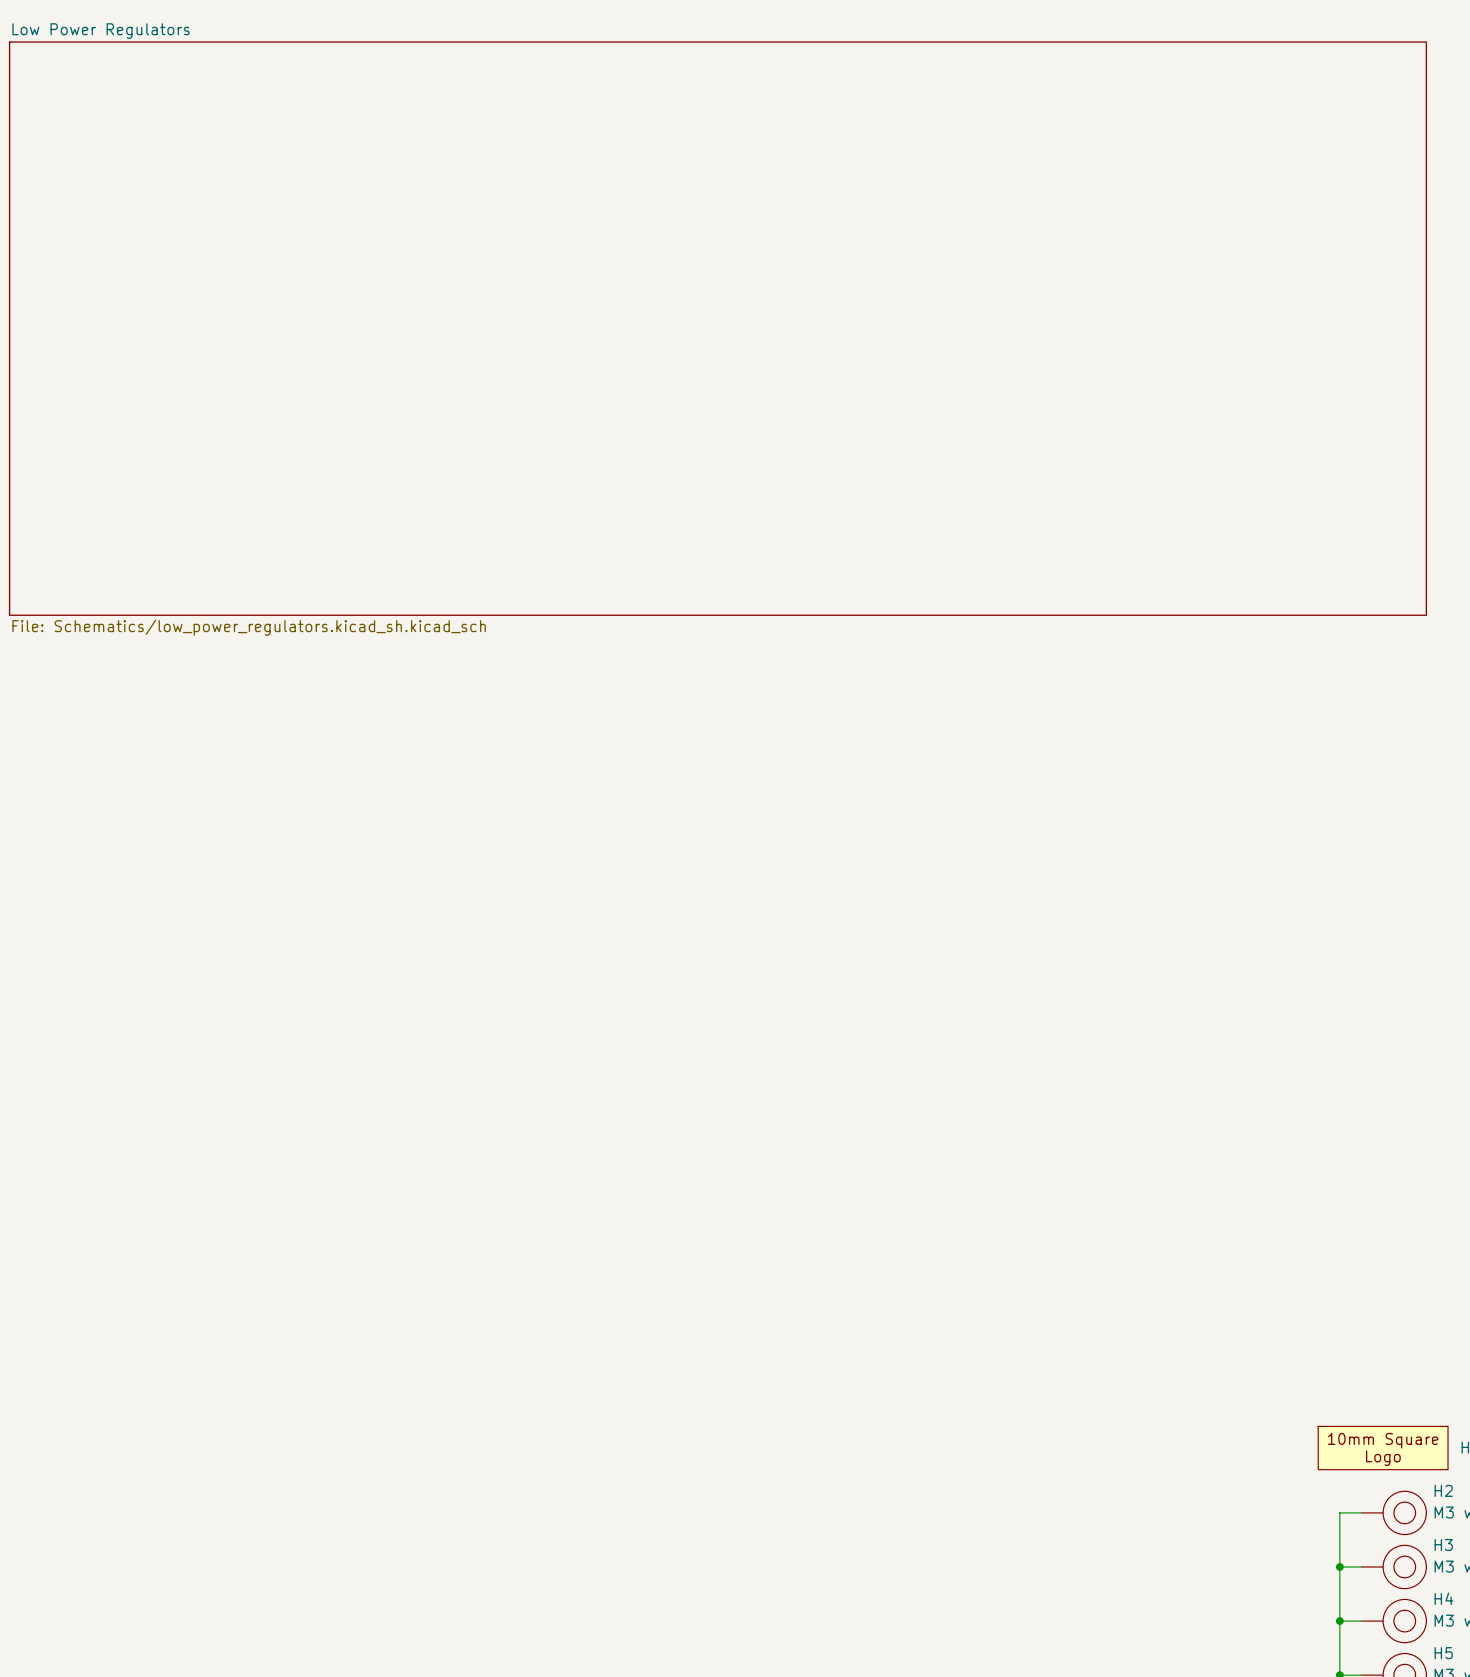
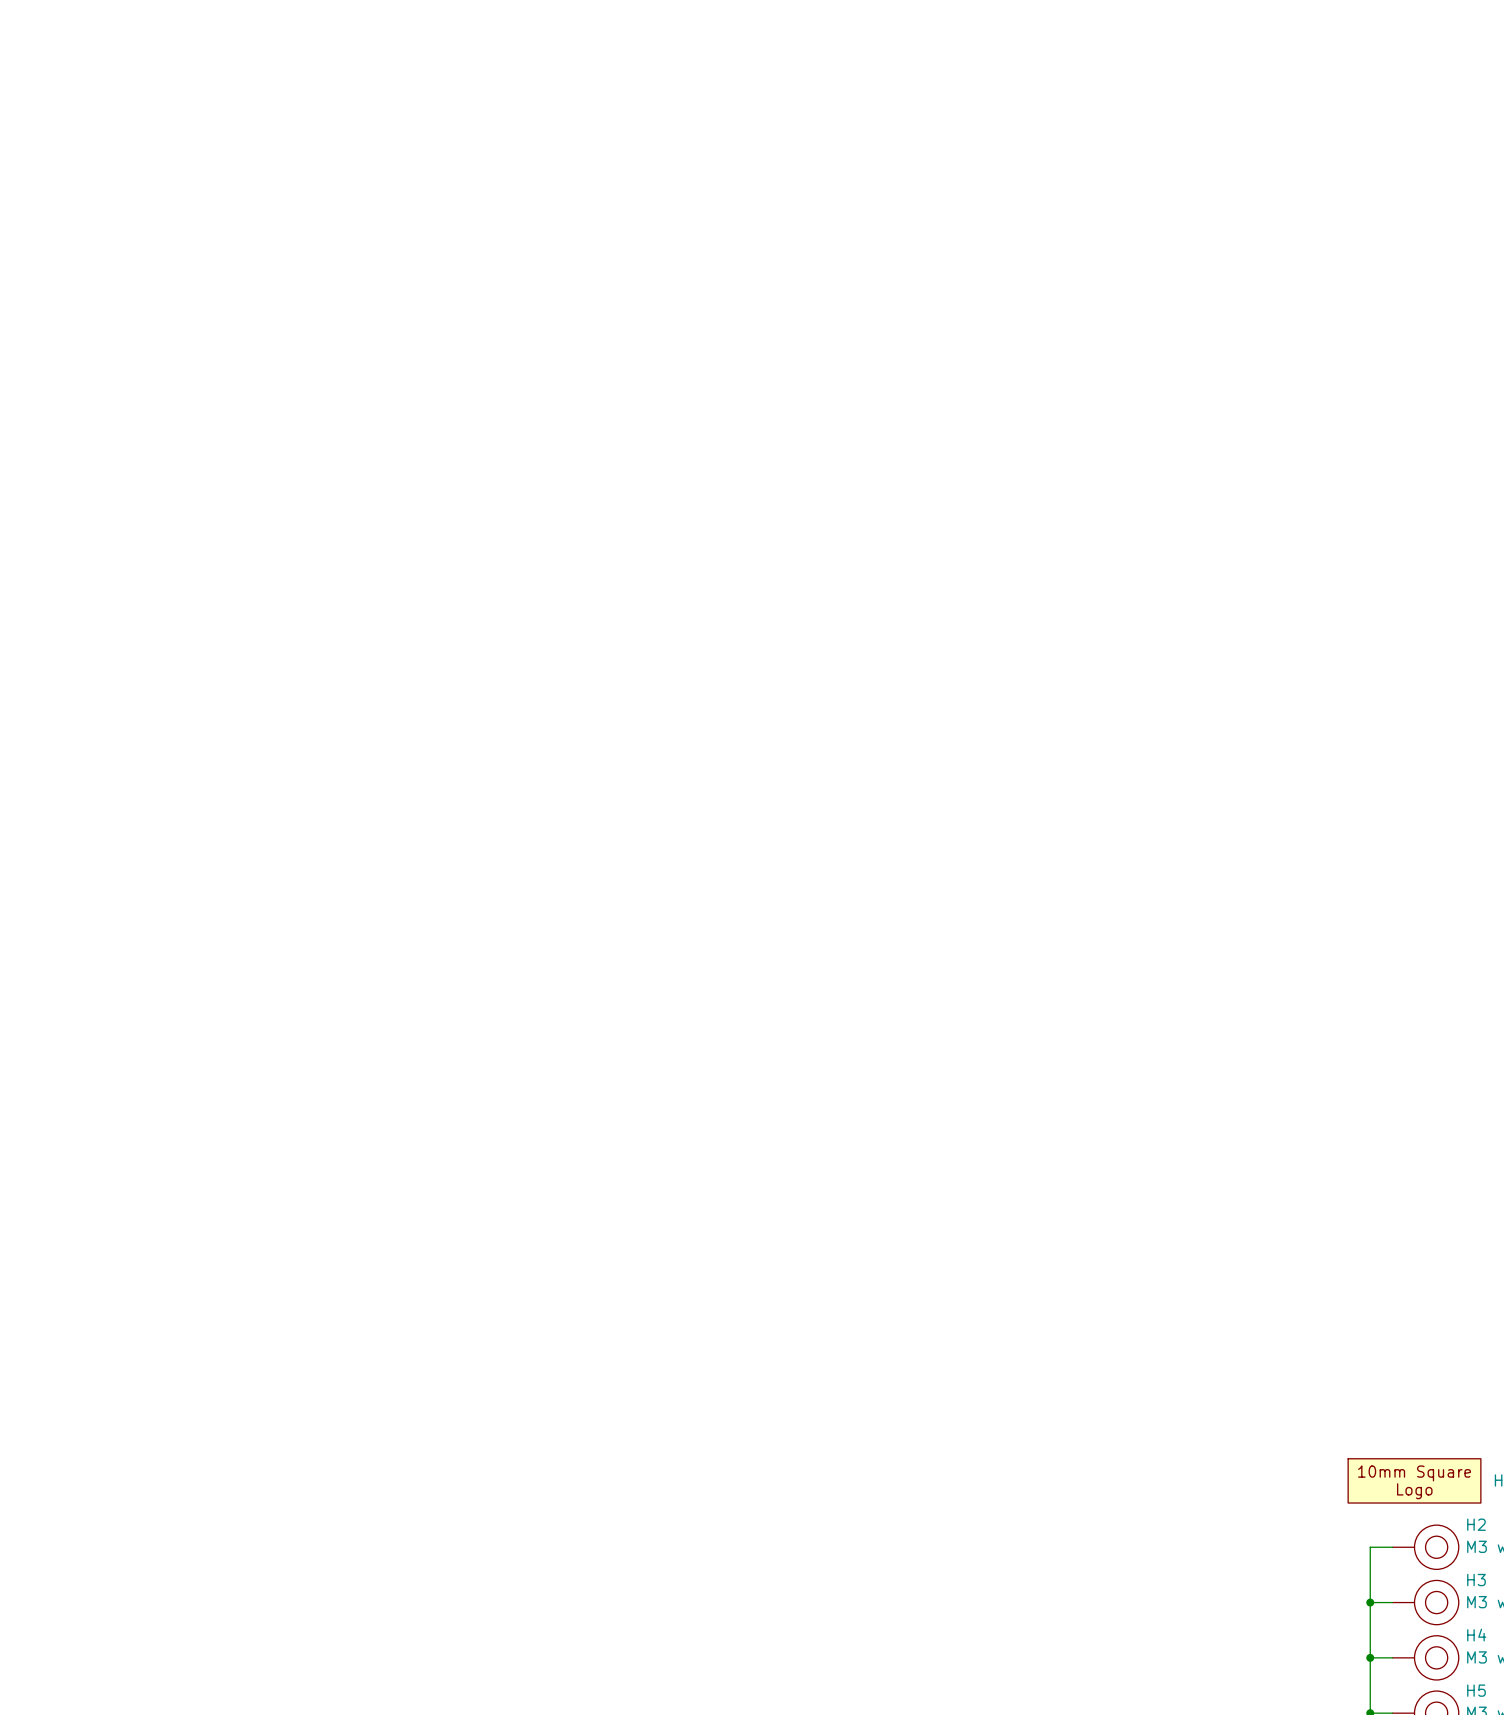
sheet Low Power Regulators: File: Schematics/low_power_regulators.kicad_sh.kicad_sch (717, 328) -> none

